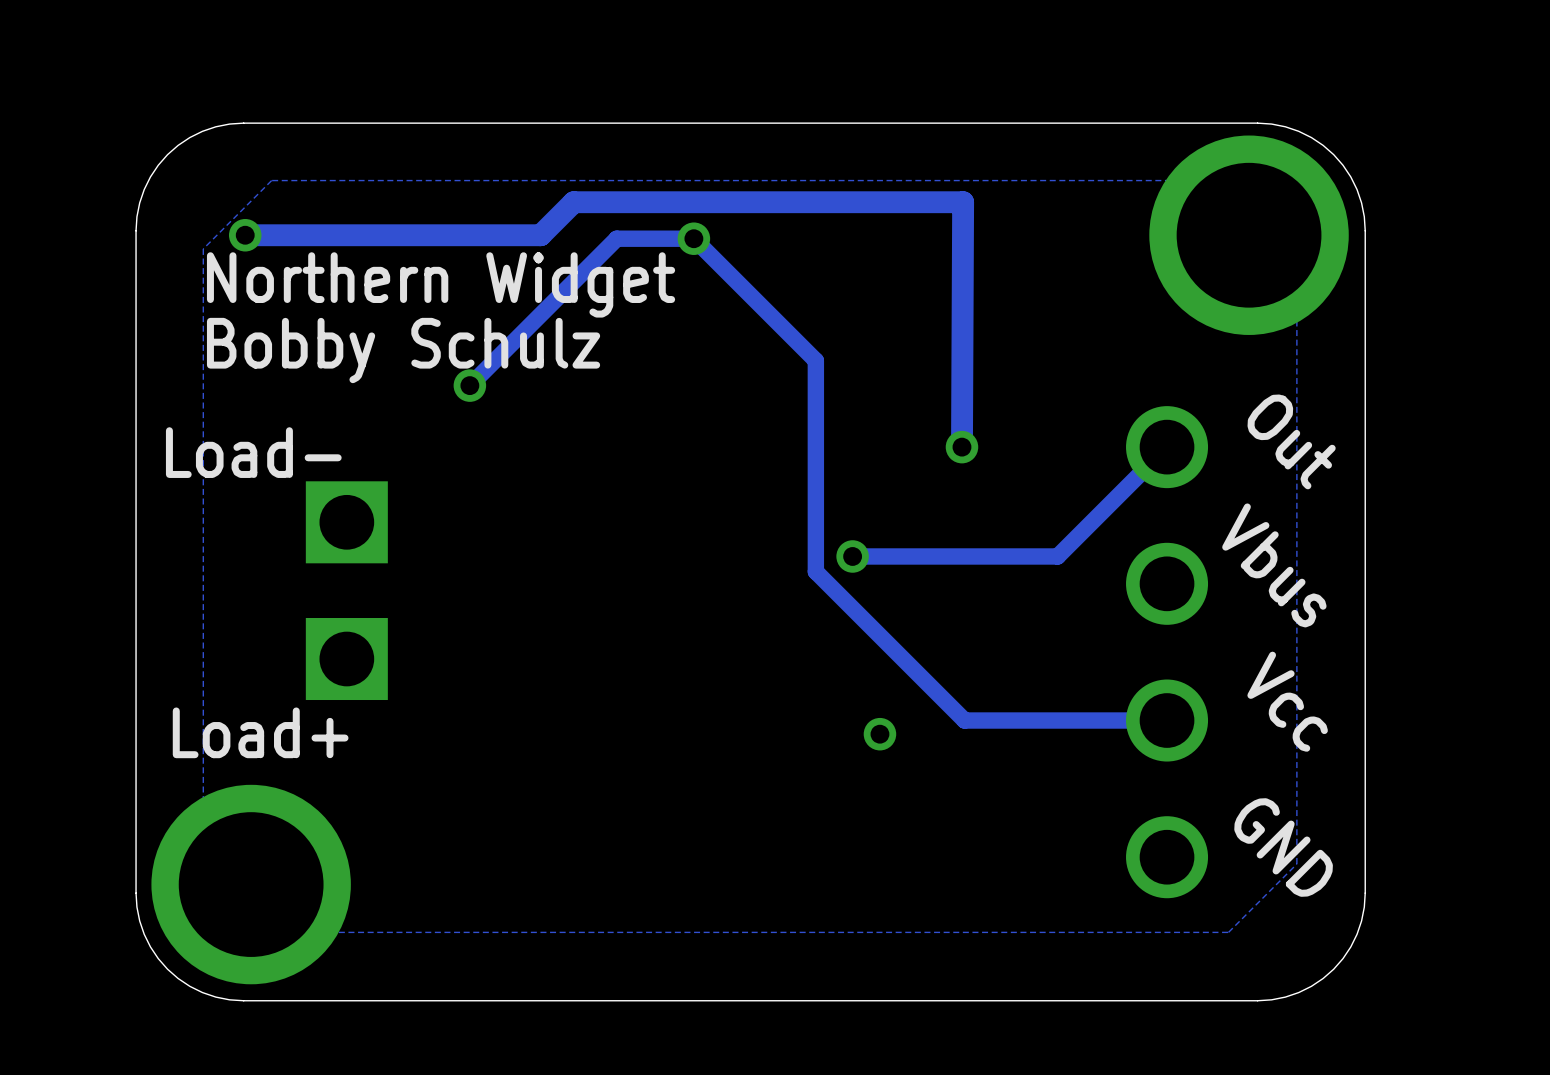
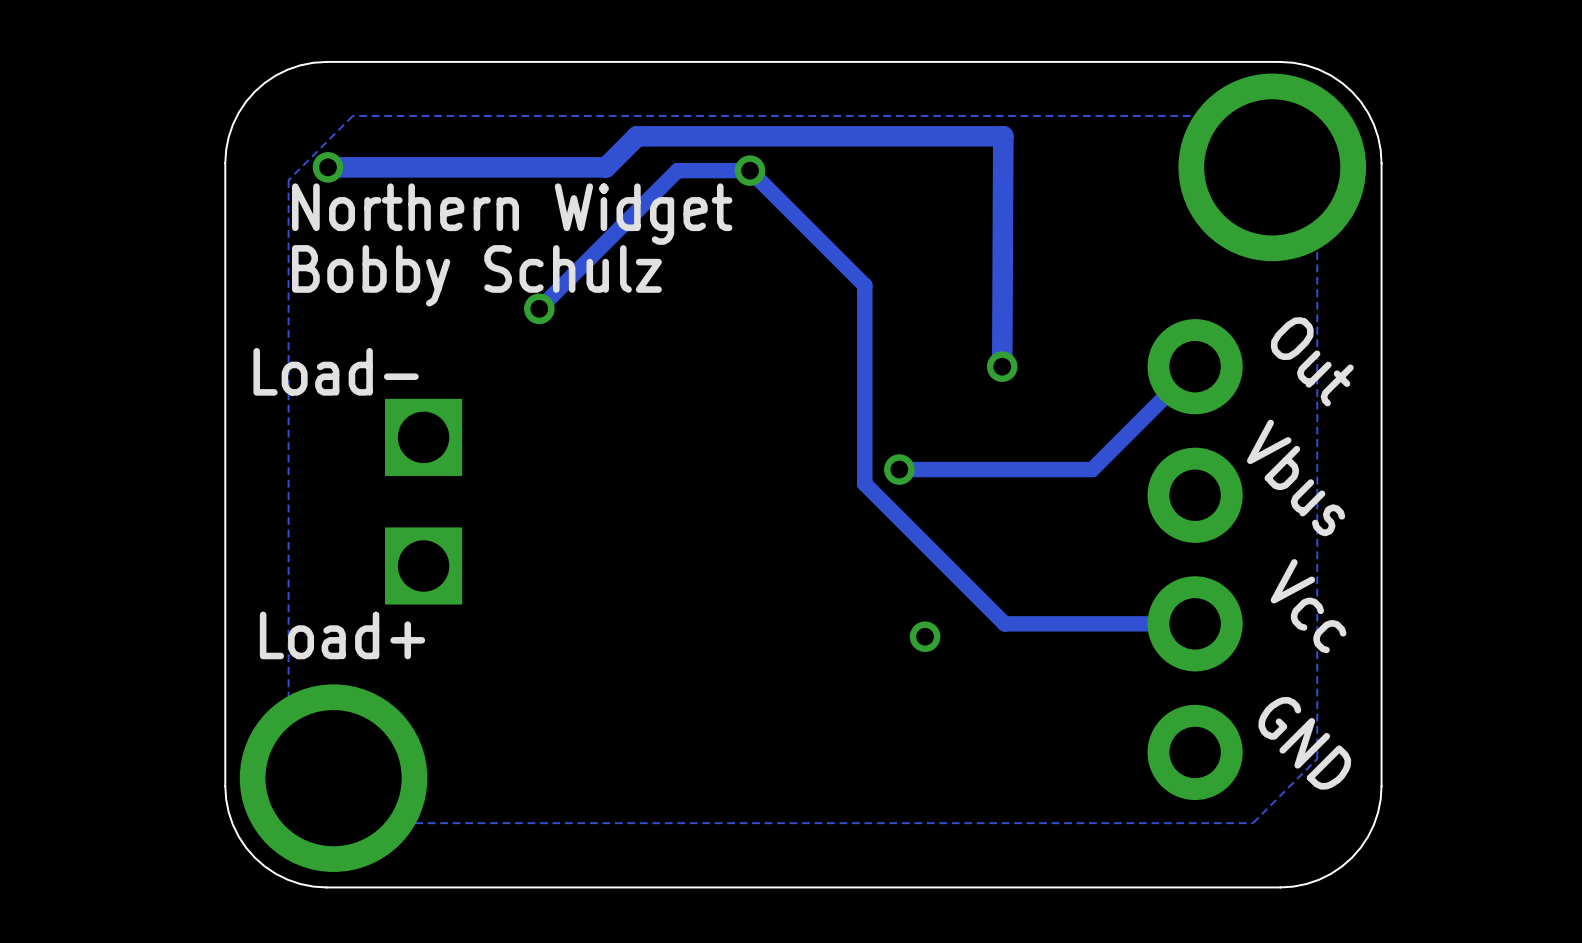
part footprint: [1126, 406, 1209, 899] -> [1147, 319, 1243, 801]

